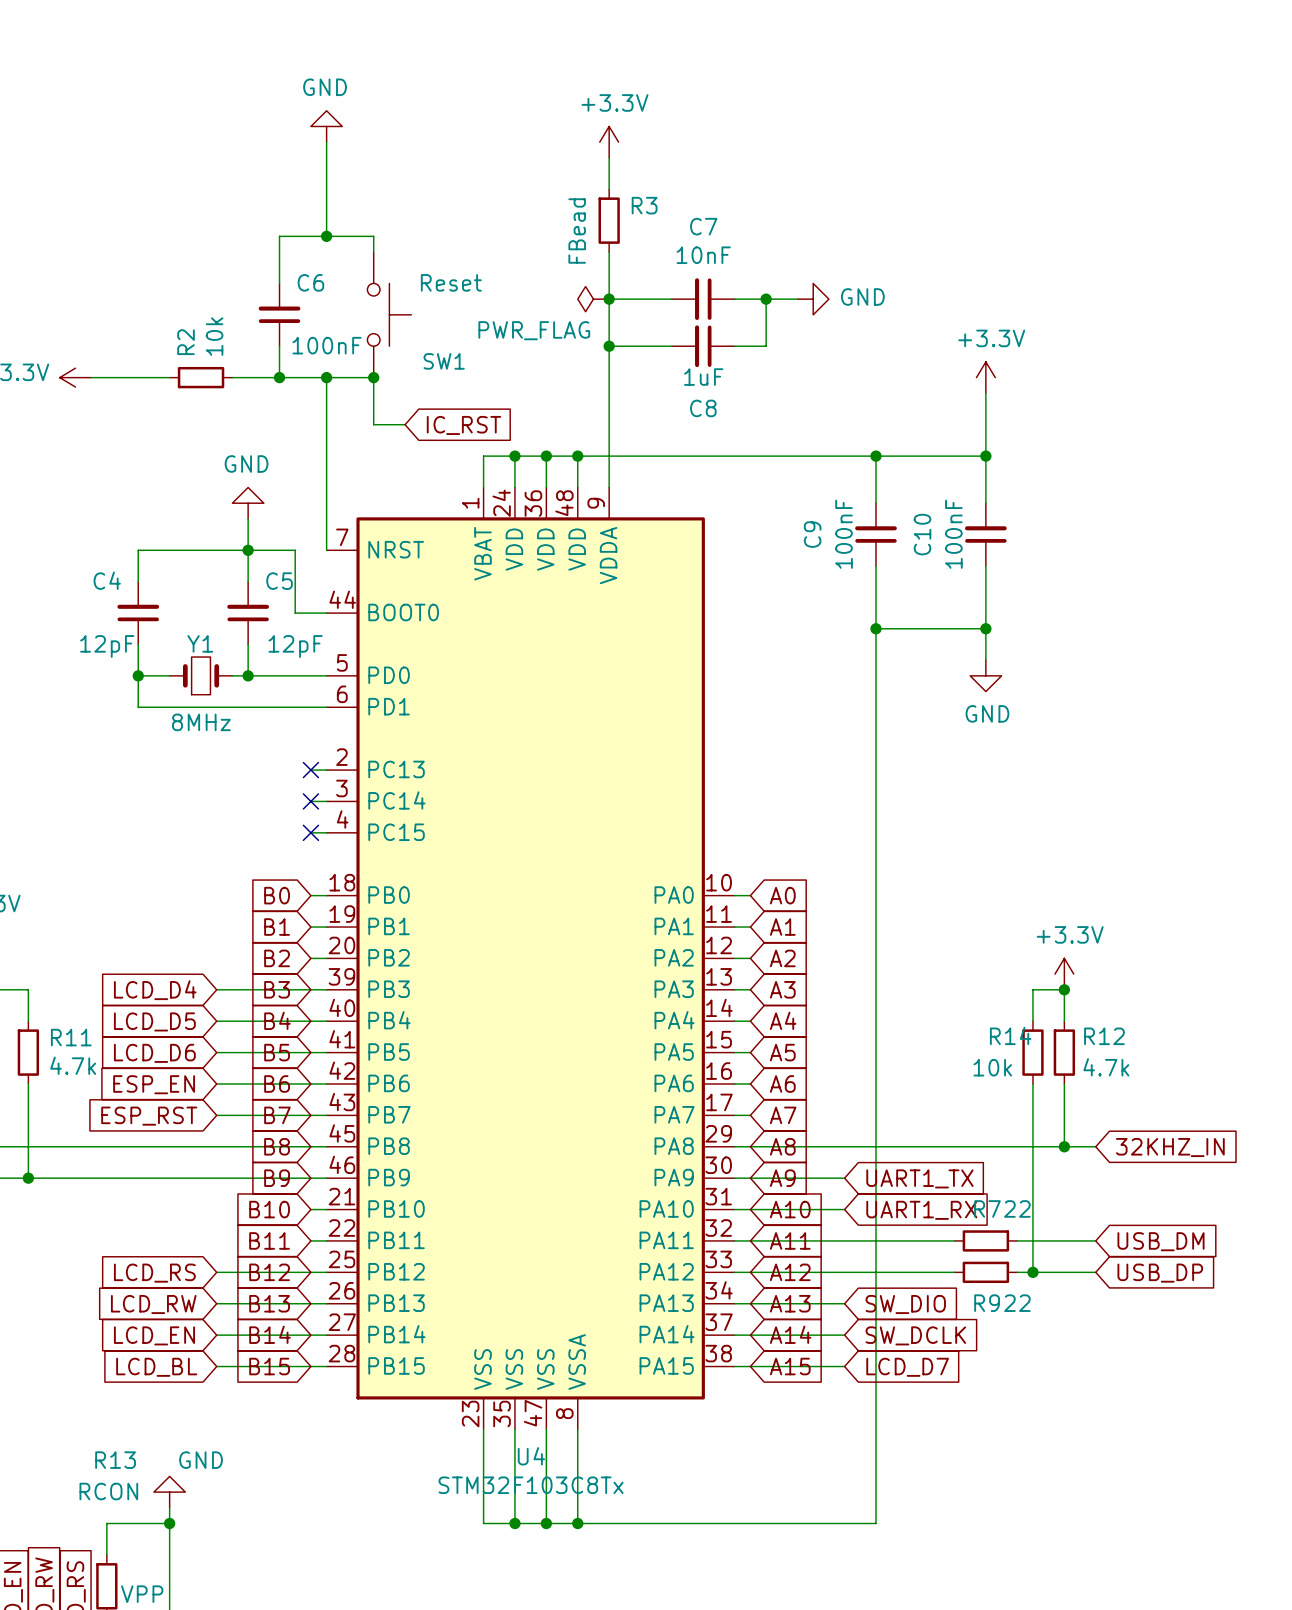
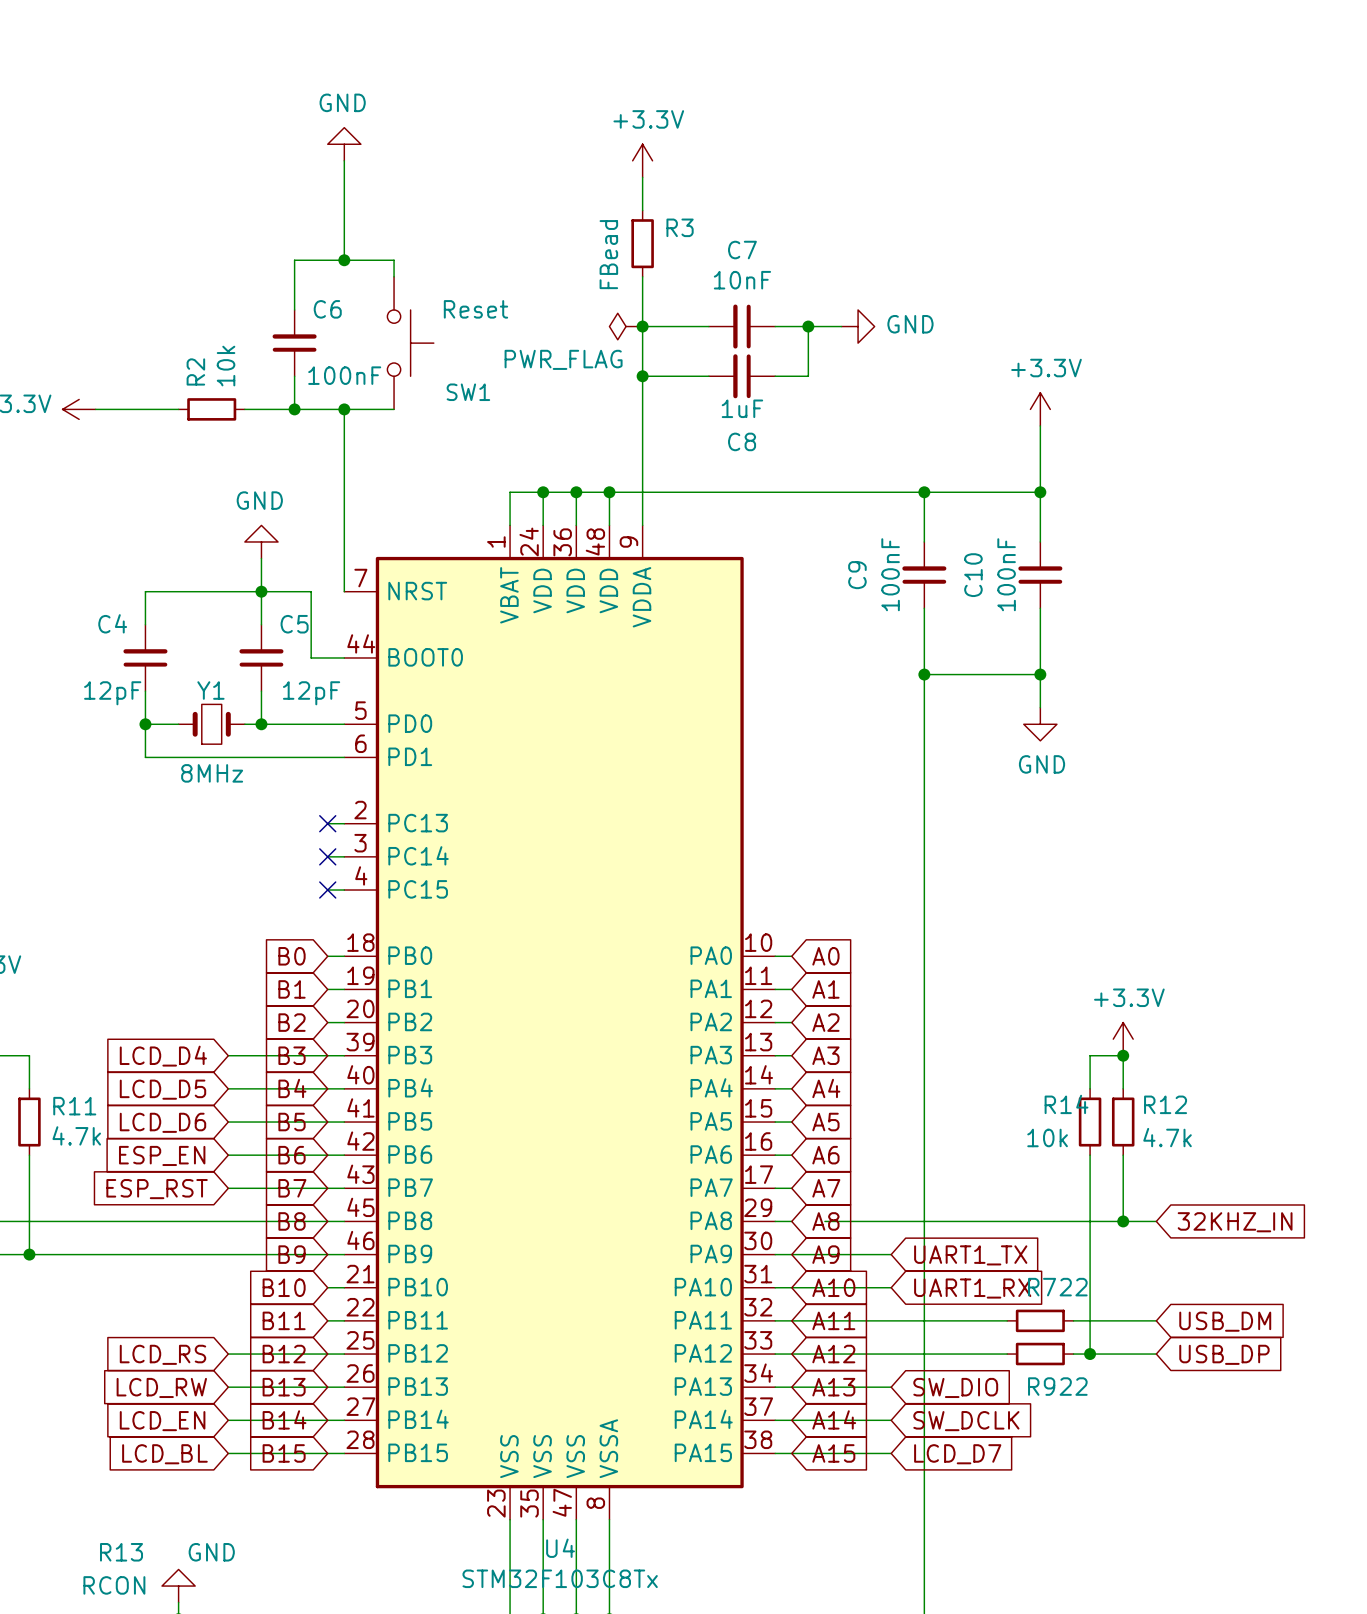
wire: (373, 377) (373, 424) (405, 424) -> none
junction: (373, 377) -> none
global label: IC_RST (463, 425) -> none
wire: (750, 1146) (781, 1146) -> none

